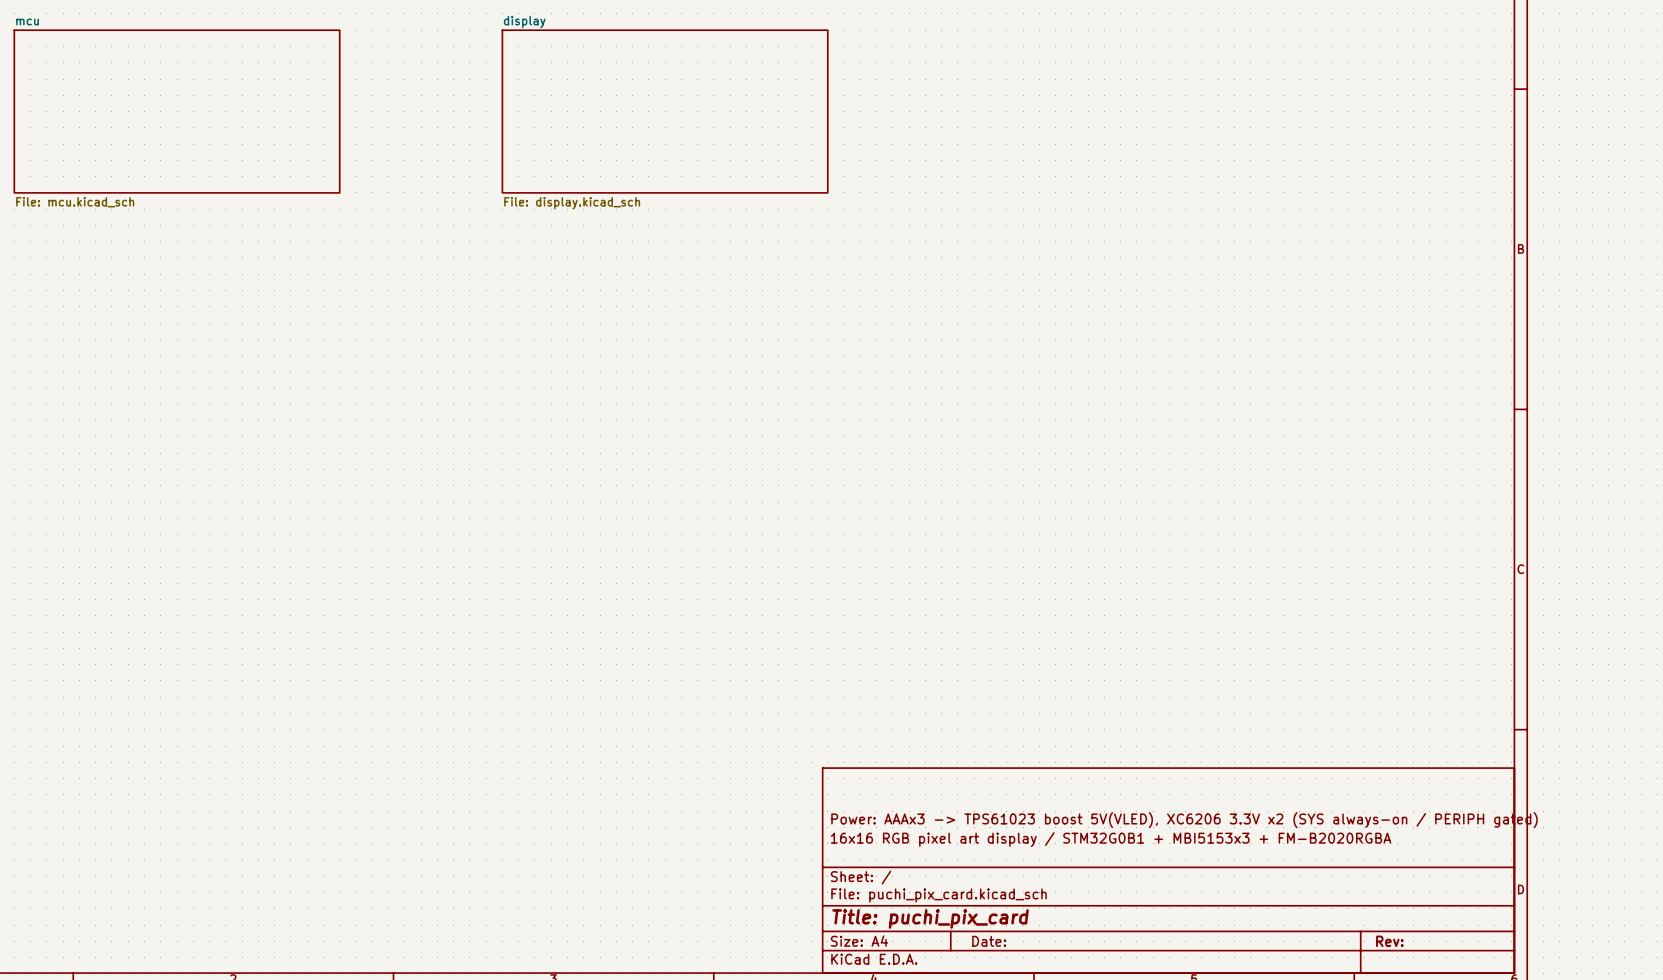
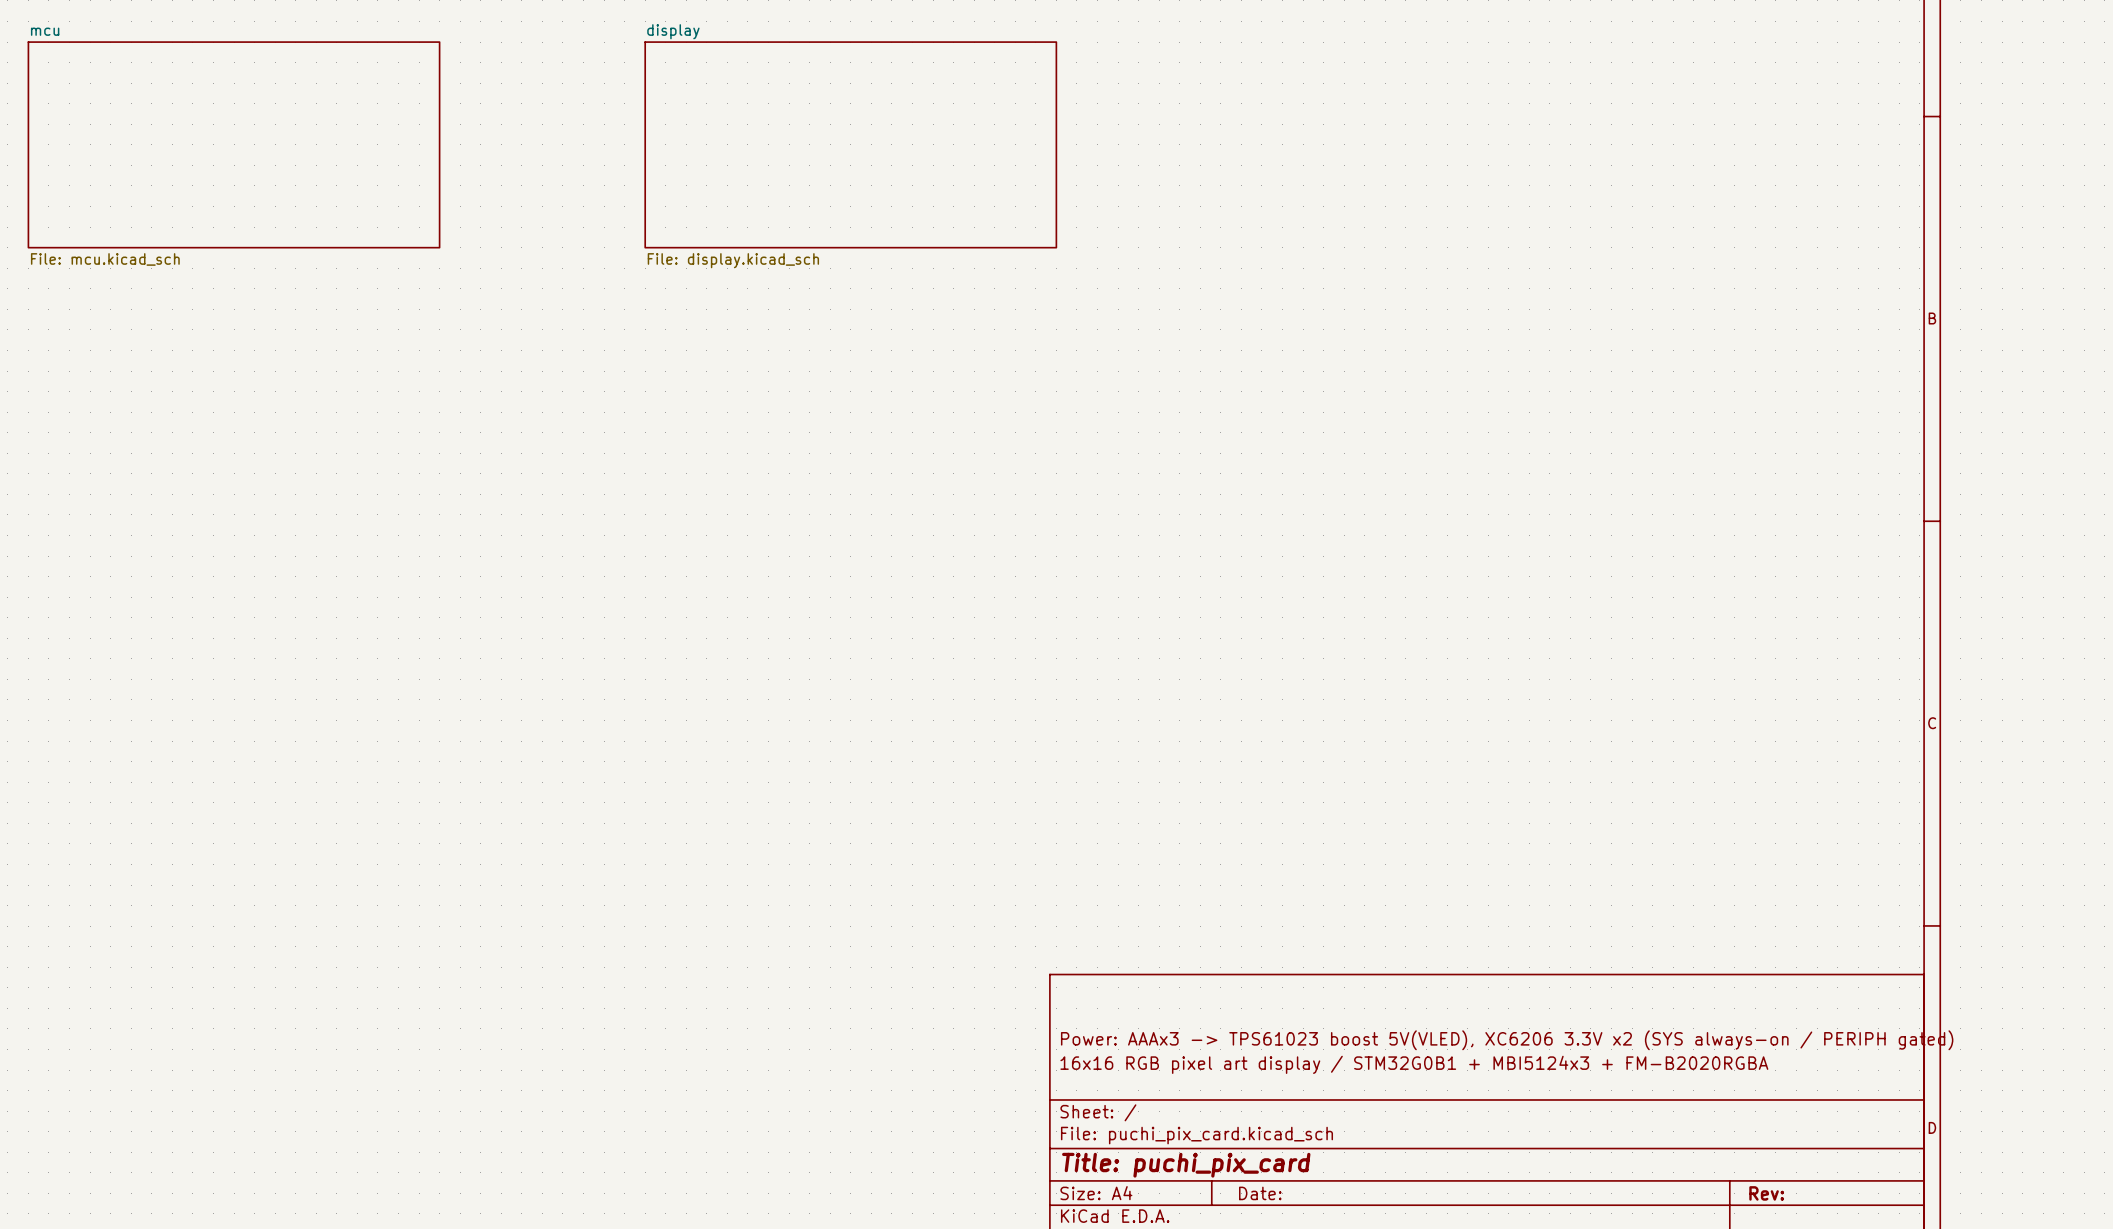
title block: 16x16 RGB pixel art display / STM32G0B1 + MBI5153x3 + FM-B2020RGBA (1111, 839) -> 16x16 RGB pixel art display / STM32G0B1 + MBI5124x3 + FM-B2020RGBA (1414, 1064)

